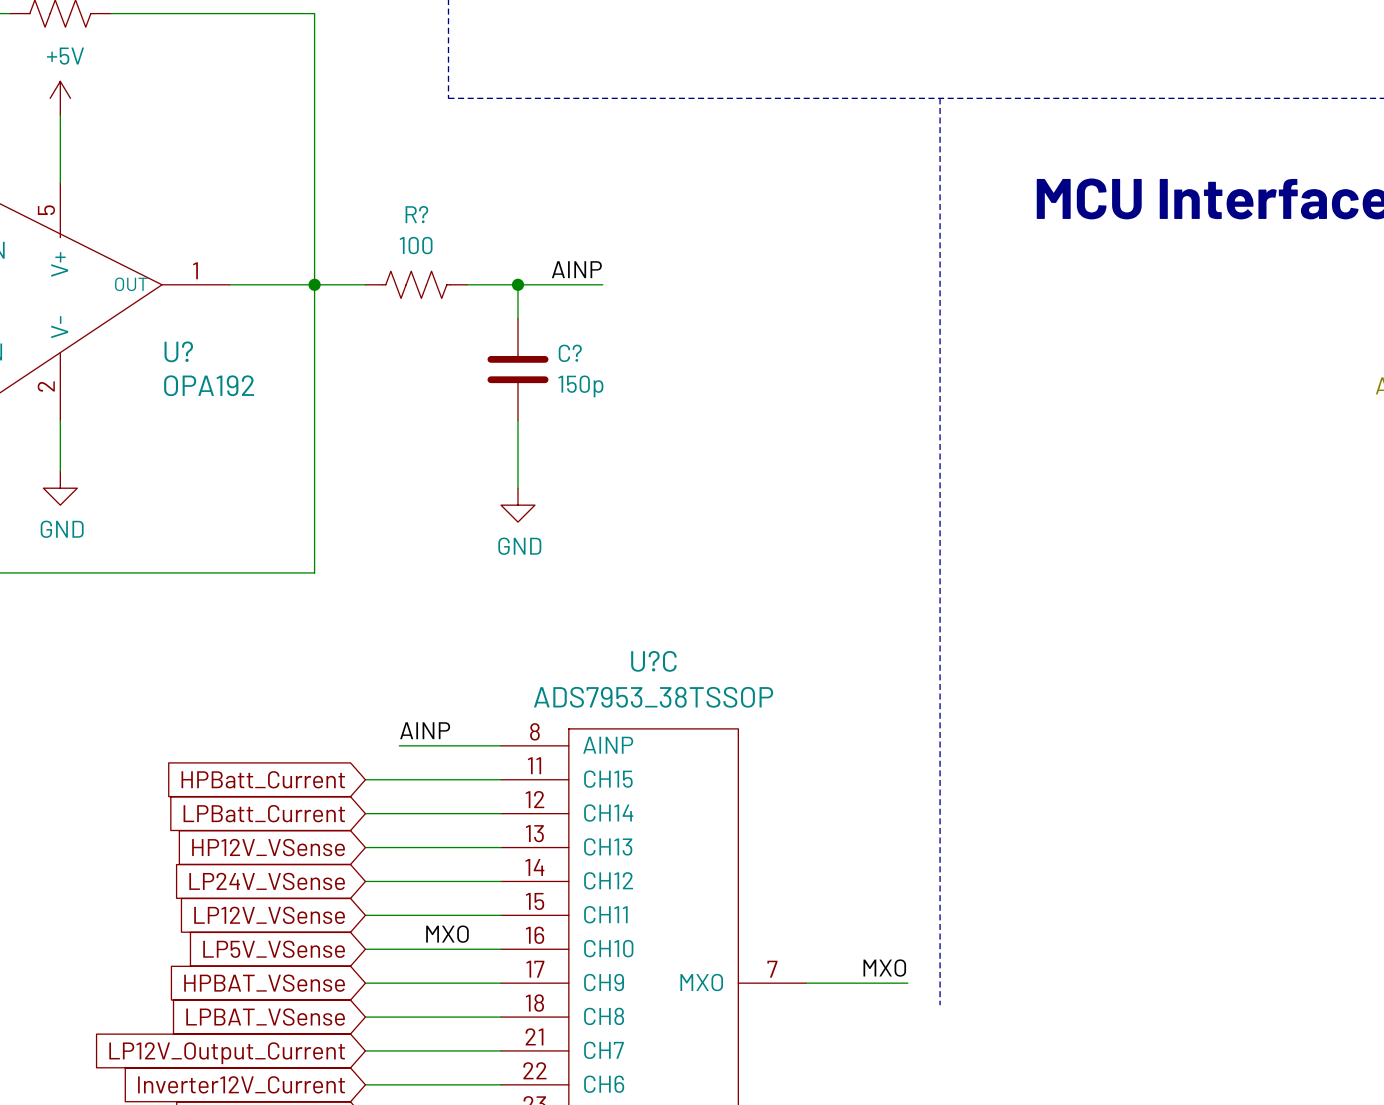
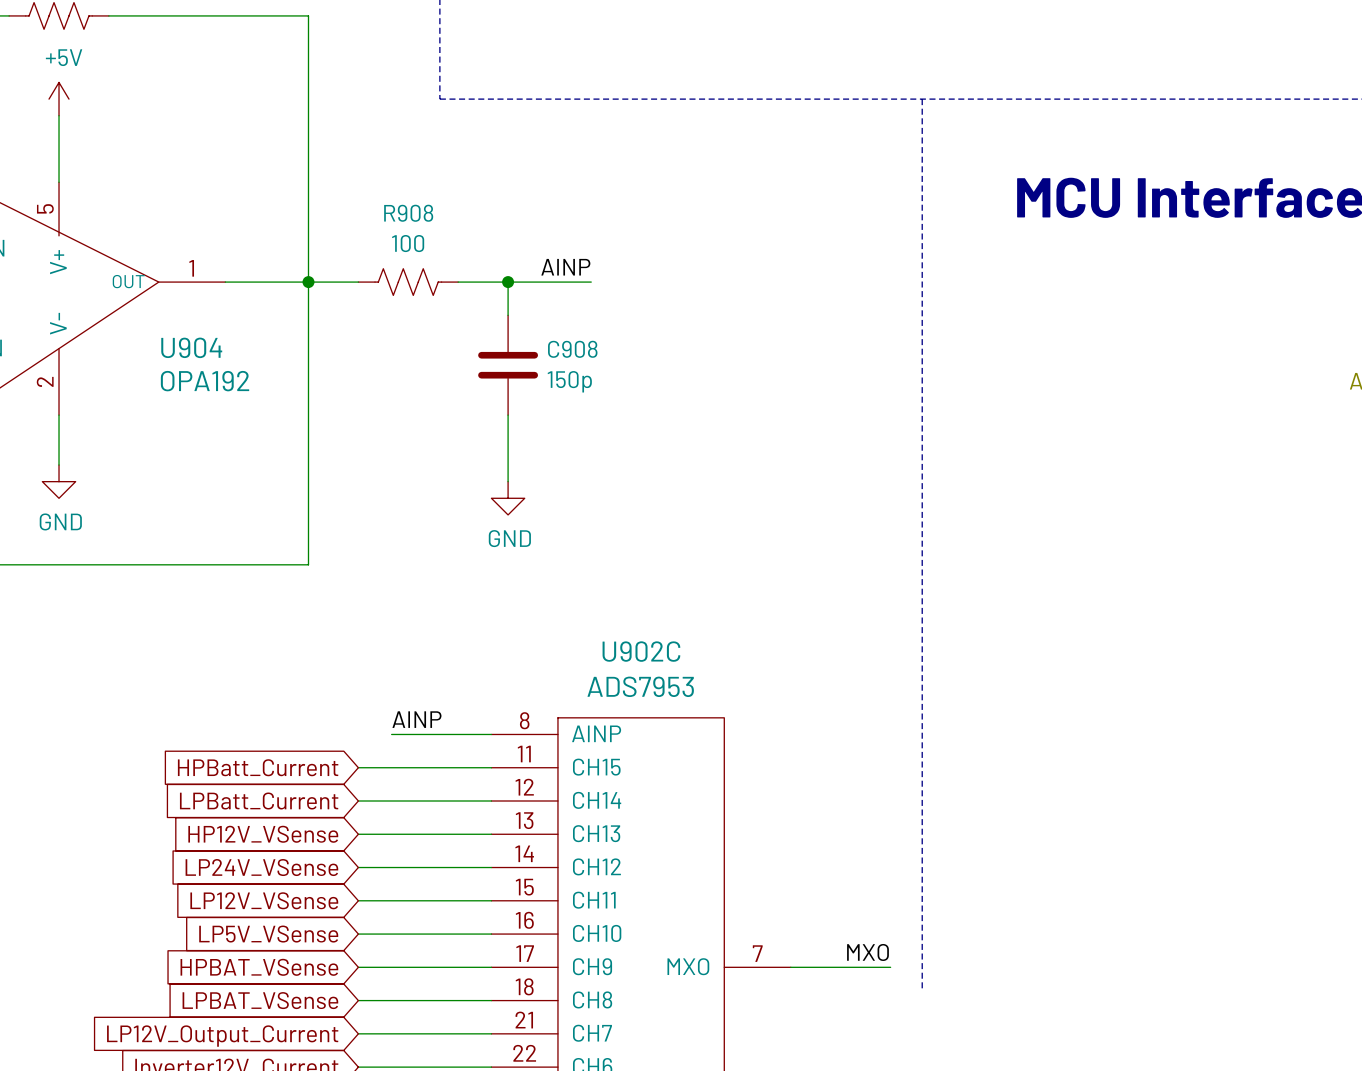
R? name: R? (416, 214) -> R908 (408, 213)
U? name: U? (178, 351) -> U904 (191, 347)
C? name: C? (570, 353) -> C908 (572, 349)
U?C name: U?C (653, 661) -> U902C (641, 651)
U?C value: ADS7953_38TSSOP (653, 697) -> ADS7953 (640, 686)
label: MXO (447, 934) -> none

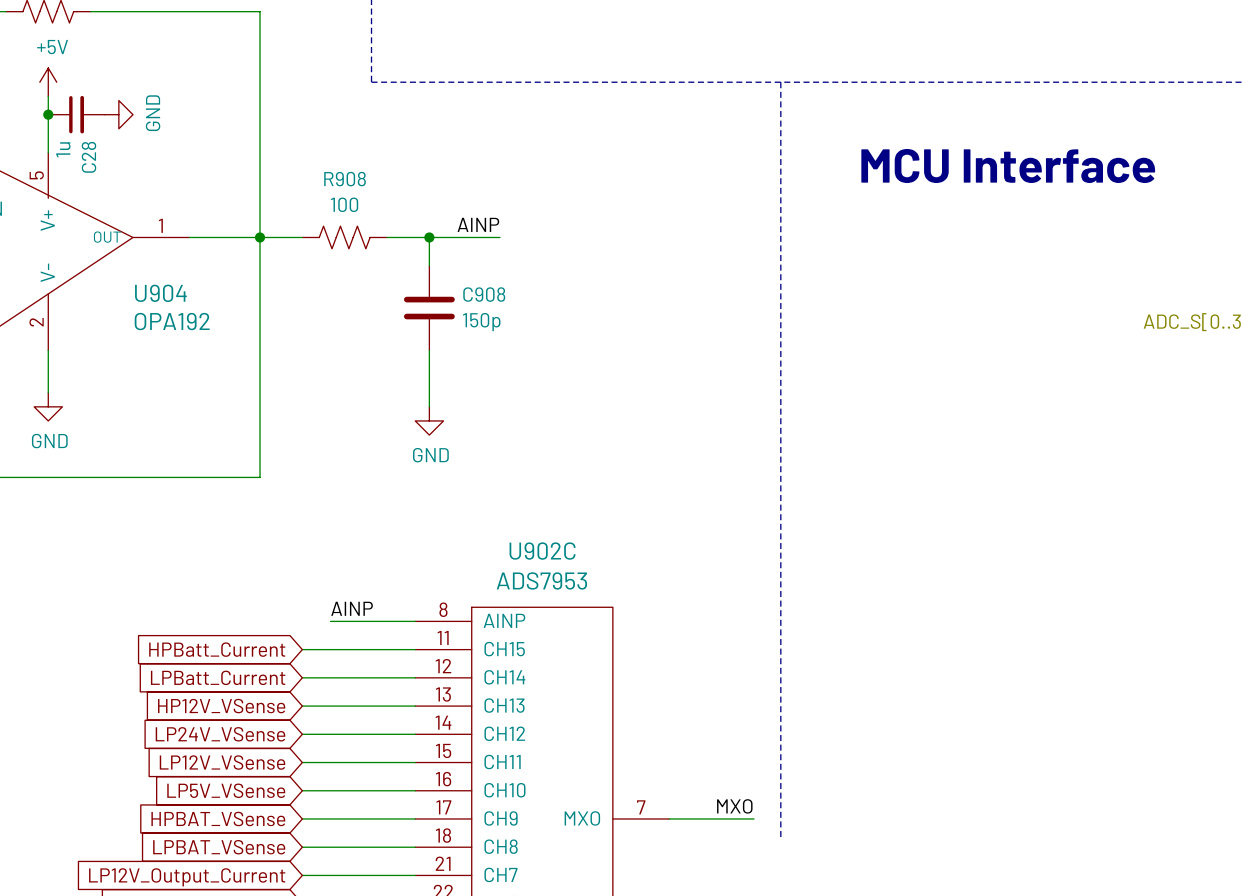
junction: none -> (48, 114)
C28: none -> 1u (76, 114)
power symbol: none -> GND (118, 114)

